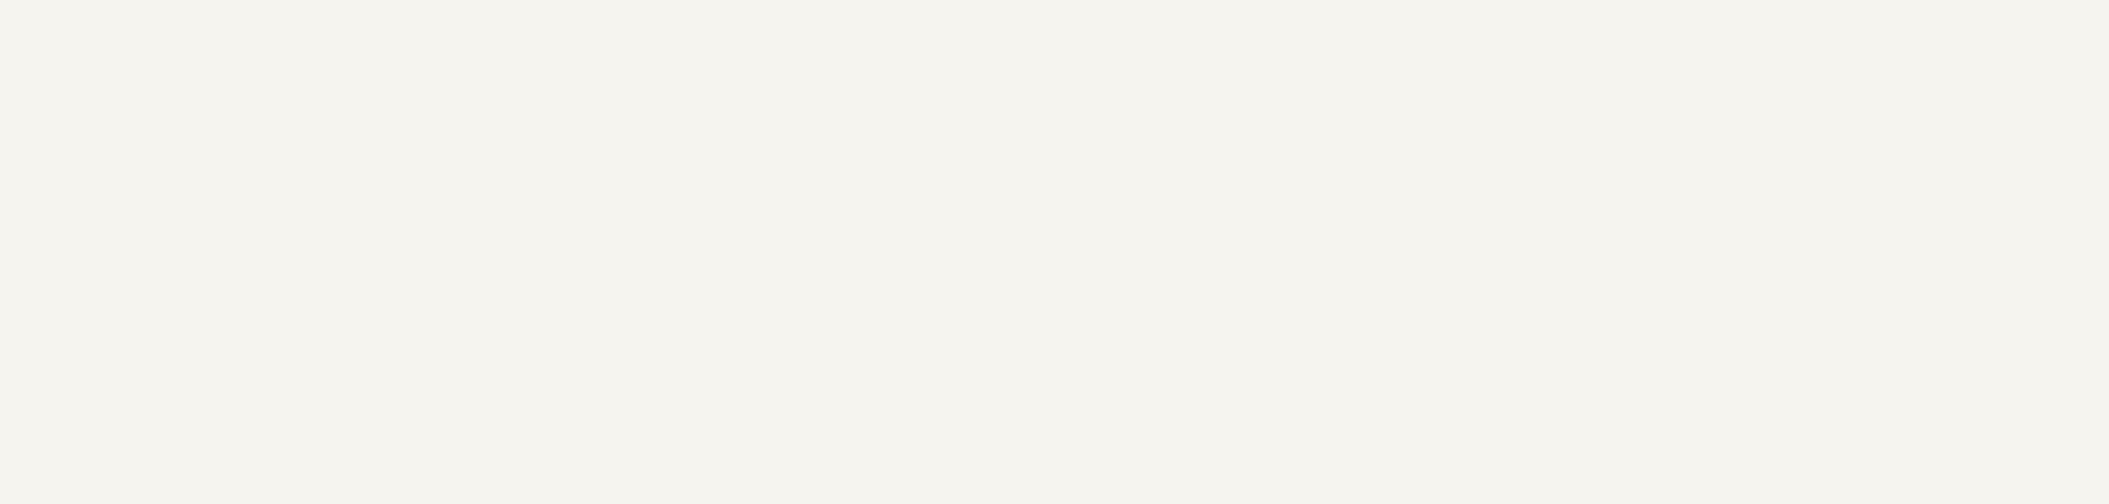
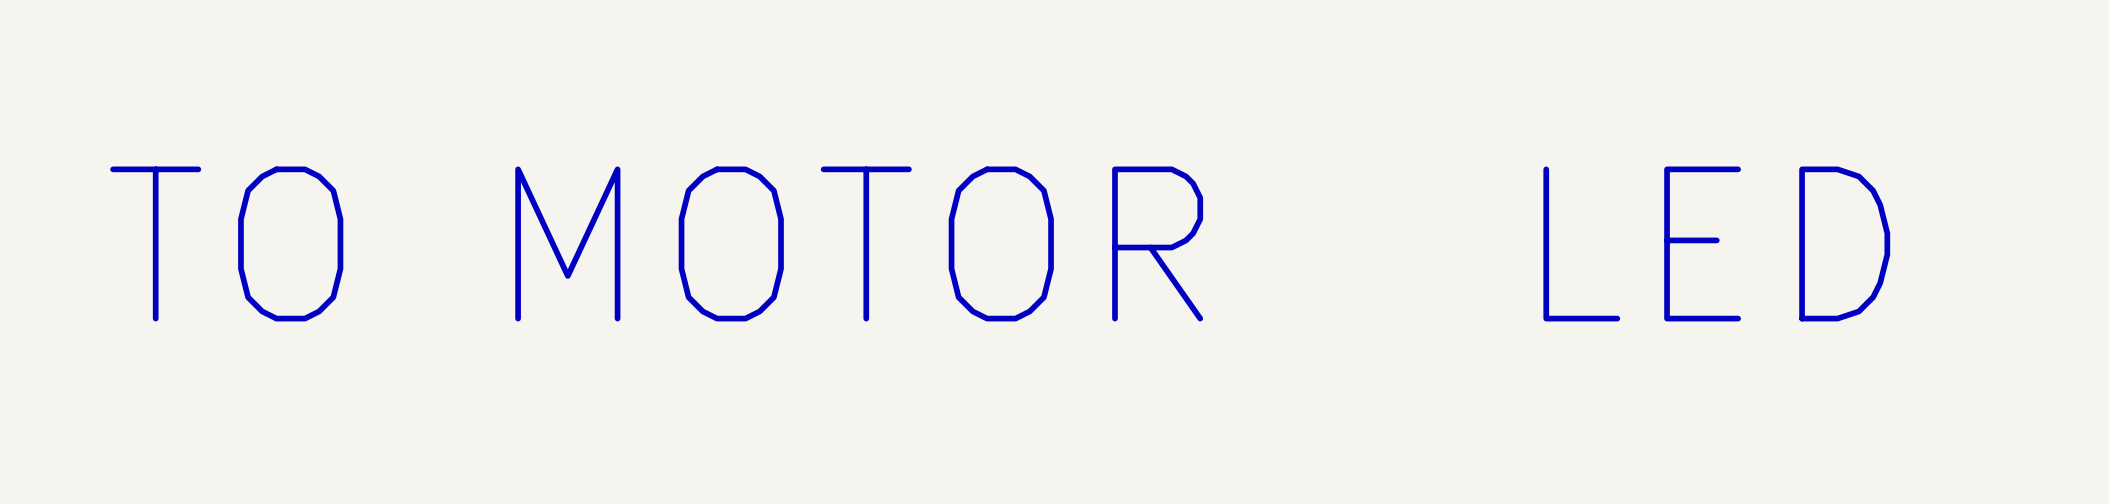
text: none -> TO MOTOR (656, 243)
text: none -> LED (1716, 243)

